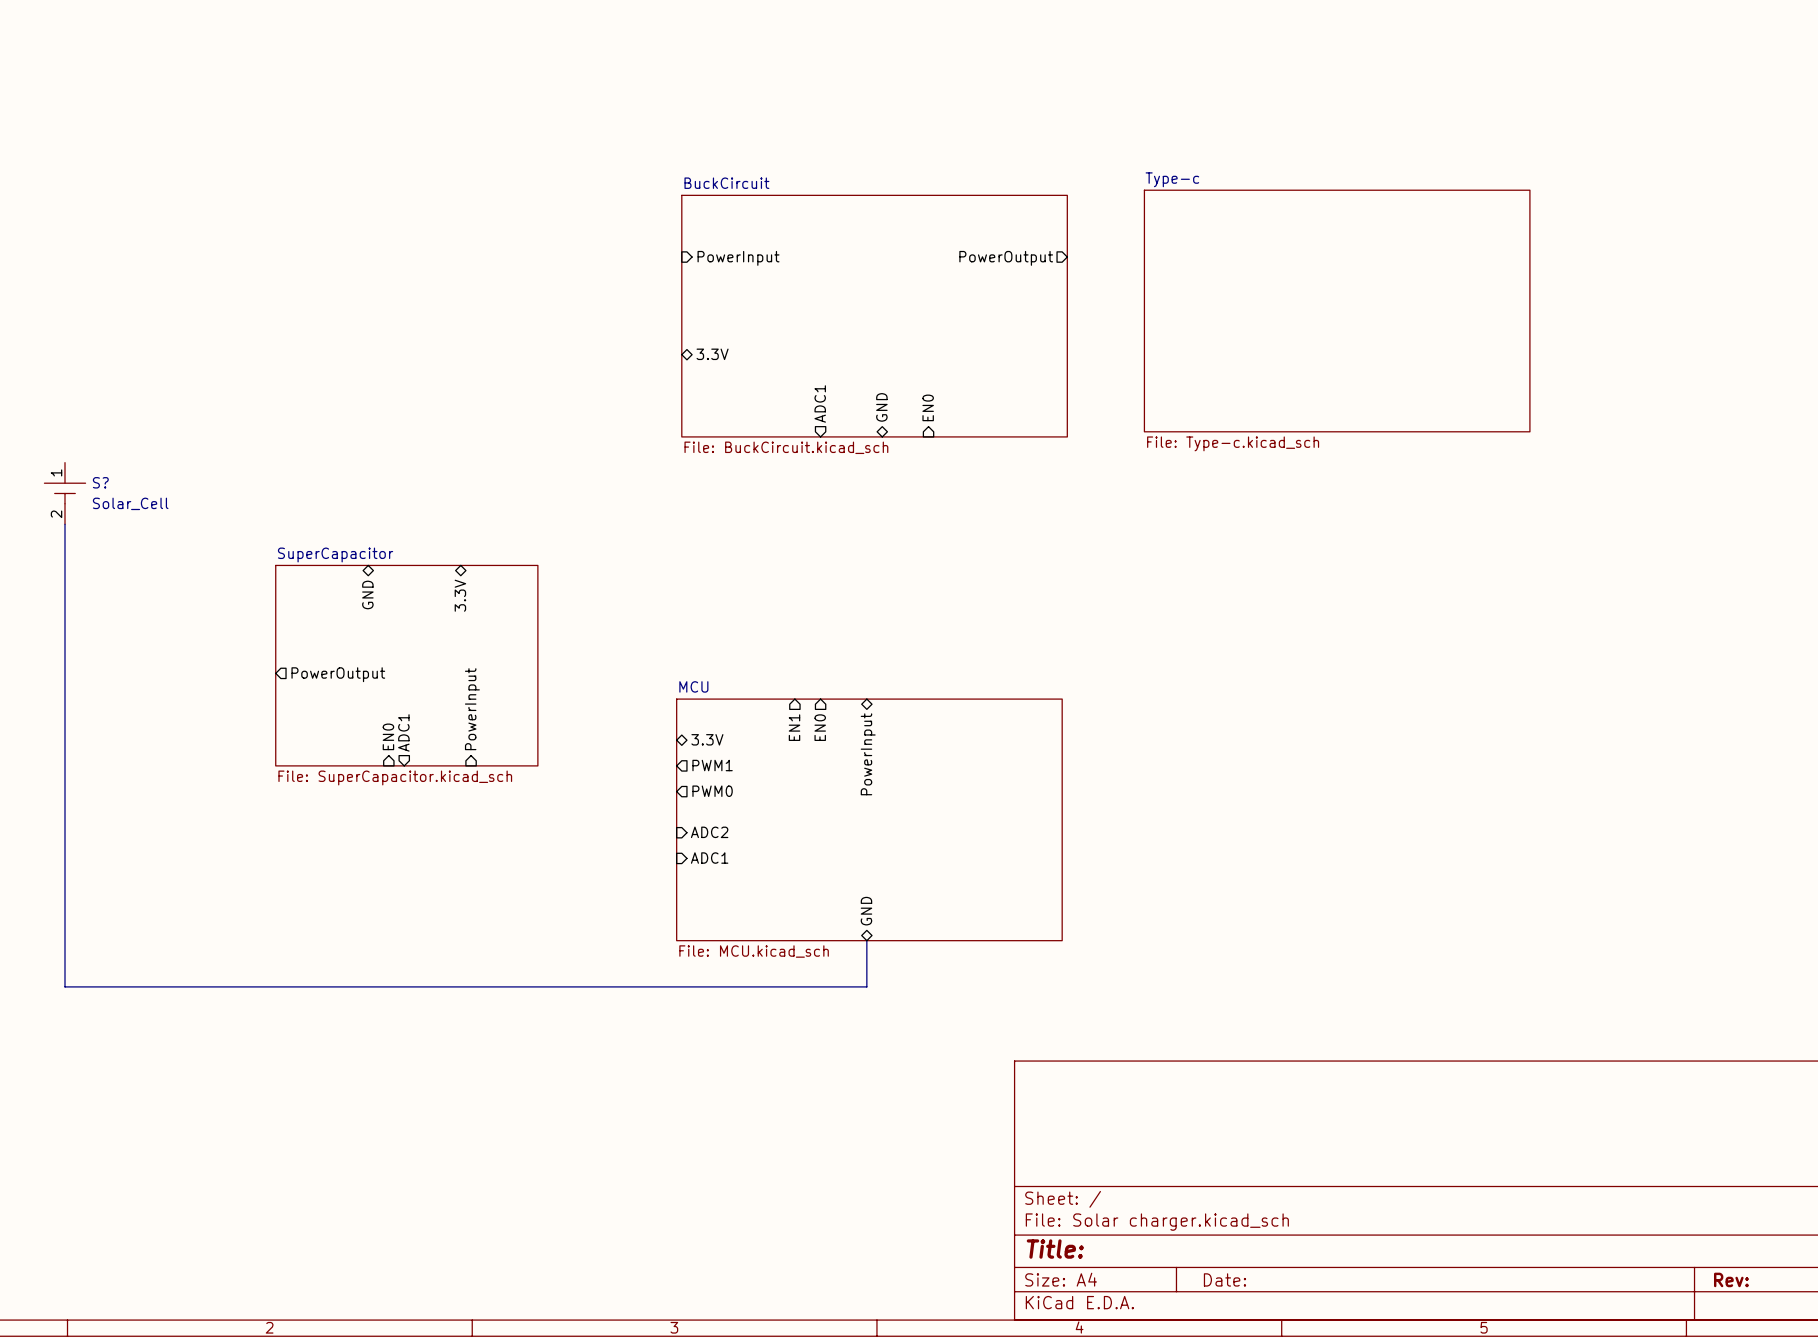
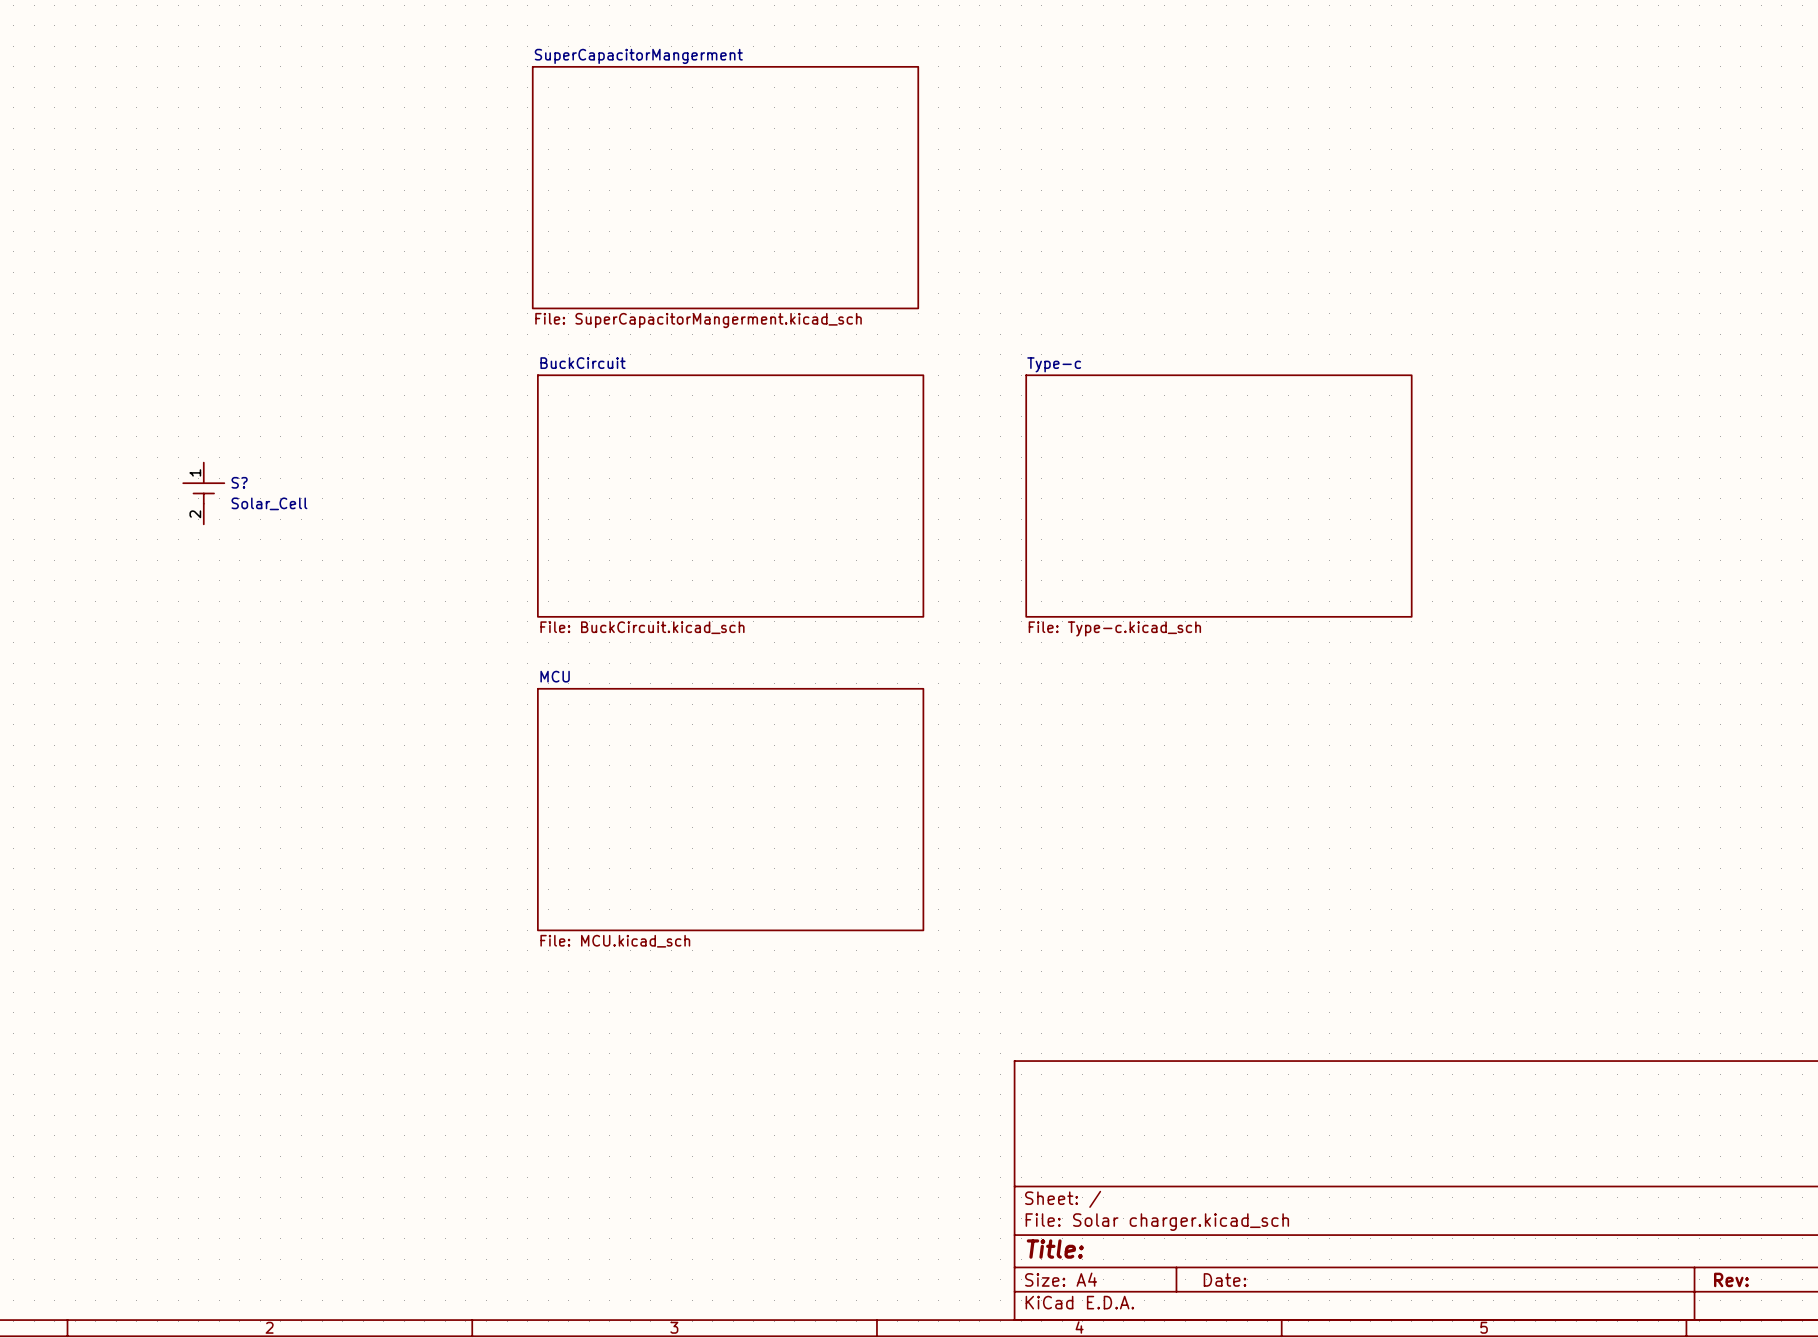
sheet SuperCapacitorMangerment: none -> File: SuperCapacitorMangerment.kicad_sch (725, 187)
sheet pin: PowerInput (738, 258) -> none
sheet pin: PowerOutput (1006, 258) -> none
sheet Type-c: File: Type-c.kicad_sch (1337, 311) -> none
sheet BuckCircuit: File: BuckCircuit.kicad_sch (874, 316) -> none
sheet pin: 3.3V (712, 354) -> none
sheet pin: ADC1 (820, 403) -> none
sheet pin: GND (881, 407) -> none
sheet pin: EN0 (928, 407) -> none
S? position: (65, 493) -> (203, 493)
sheet BuckCircuit: none -> File: BuckCircuit.kicad_sch (730, 496)
sheet Type-c: none -> File: Type-c.kicad_sch (1218, 496)
wire: (65, 524) (65, 986) (866, 986) (866, 940) -> none
sheet pin: GND (367, 594) -> none
sheet pin: 3.3V (460, 595) -> none
sheet SuperCapacitor: File: SuperCapacitor.kicad_sch (406, 665) -> none
sheet pin: PowerOutput (338, 674) -> none
sheet pin: PowerInput (472, 709) -> none
sheet pin: EN1 (794, 727) -> none
sheet pin: EN0 (820, 727) -> none
sheet pin: ADC1 (403, 732) -> none
sheet pin: EN0 (388, 736) -> none
sheet pin: 3.3V (707, 739) -> none
sheet pin: PowerInput (868, 754) -> none
sheet pin: PWM1 (712, 765) -> none
sheet pin: PWM0 (712, 791) -> none
sheet MCU position: (869, 819) -> (730, 809)
sheet pin: ADC2 (709, 832) -> none
sheet pin: ADC1 (709, 858) -> none
sheet pin: GND (866, 911) -> none

